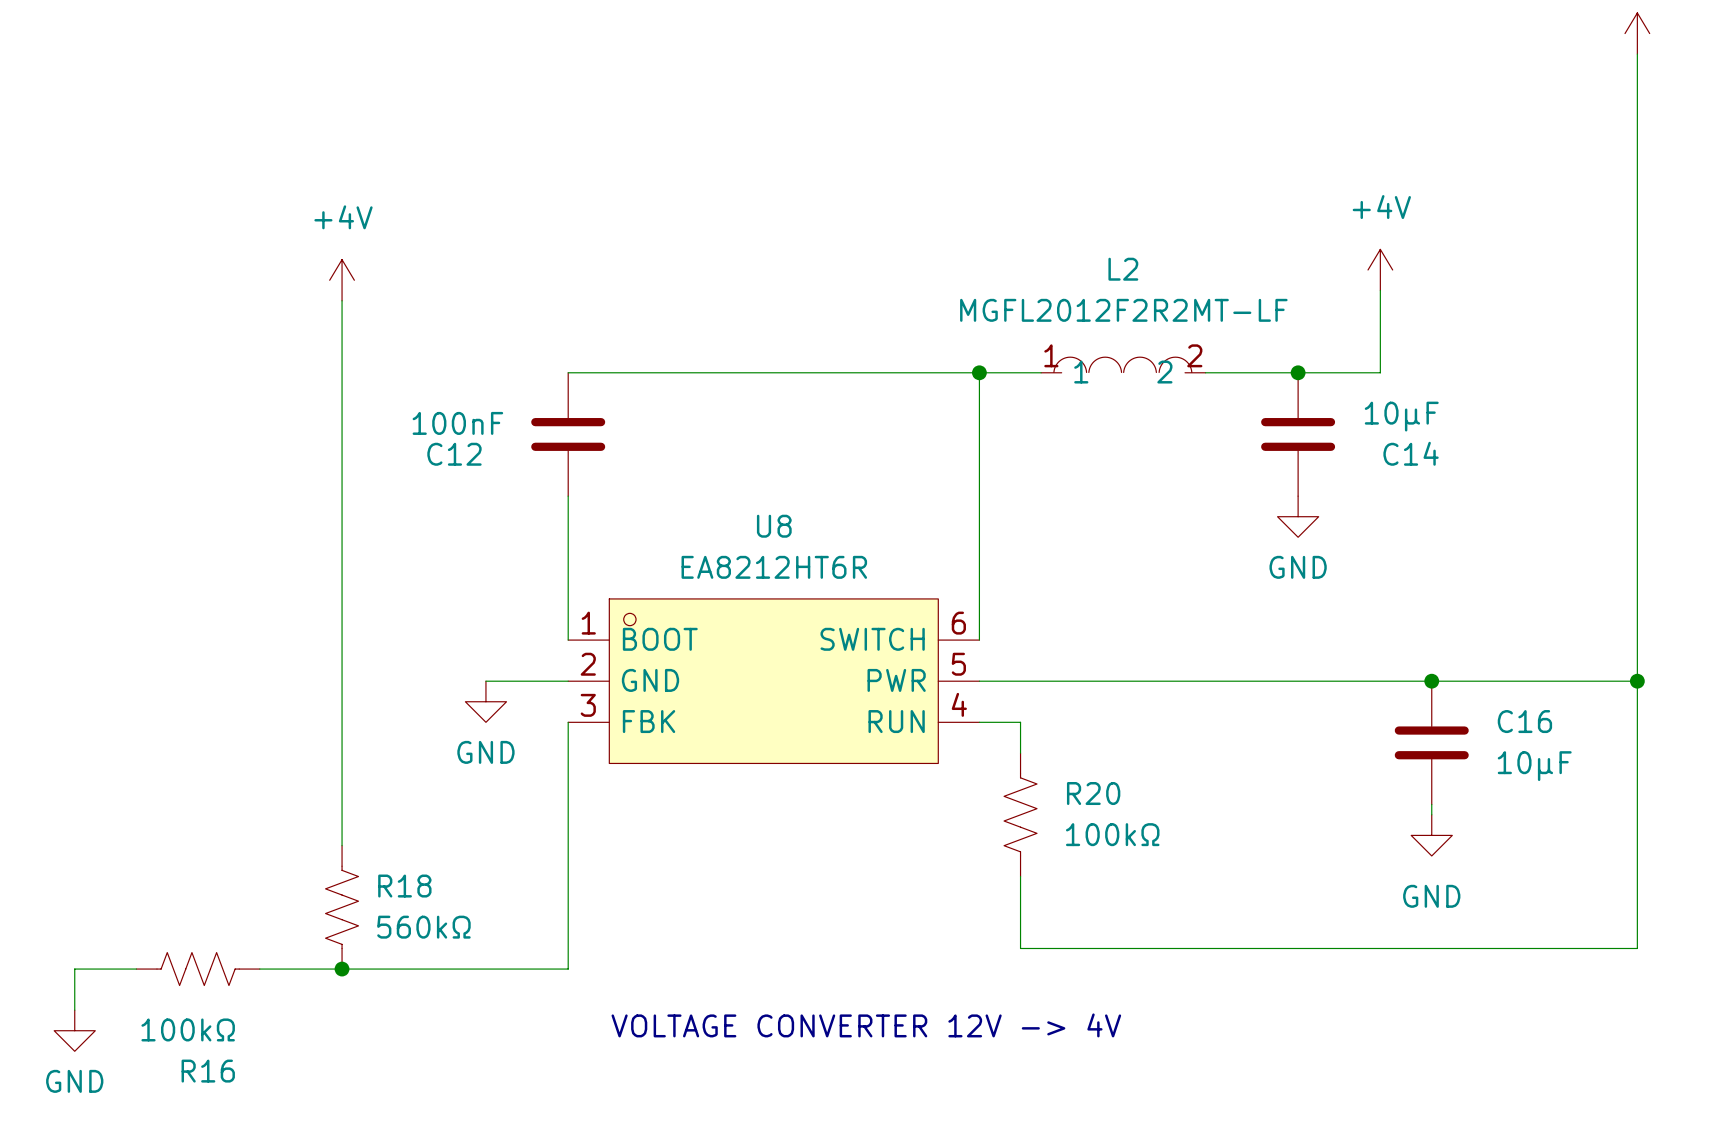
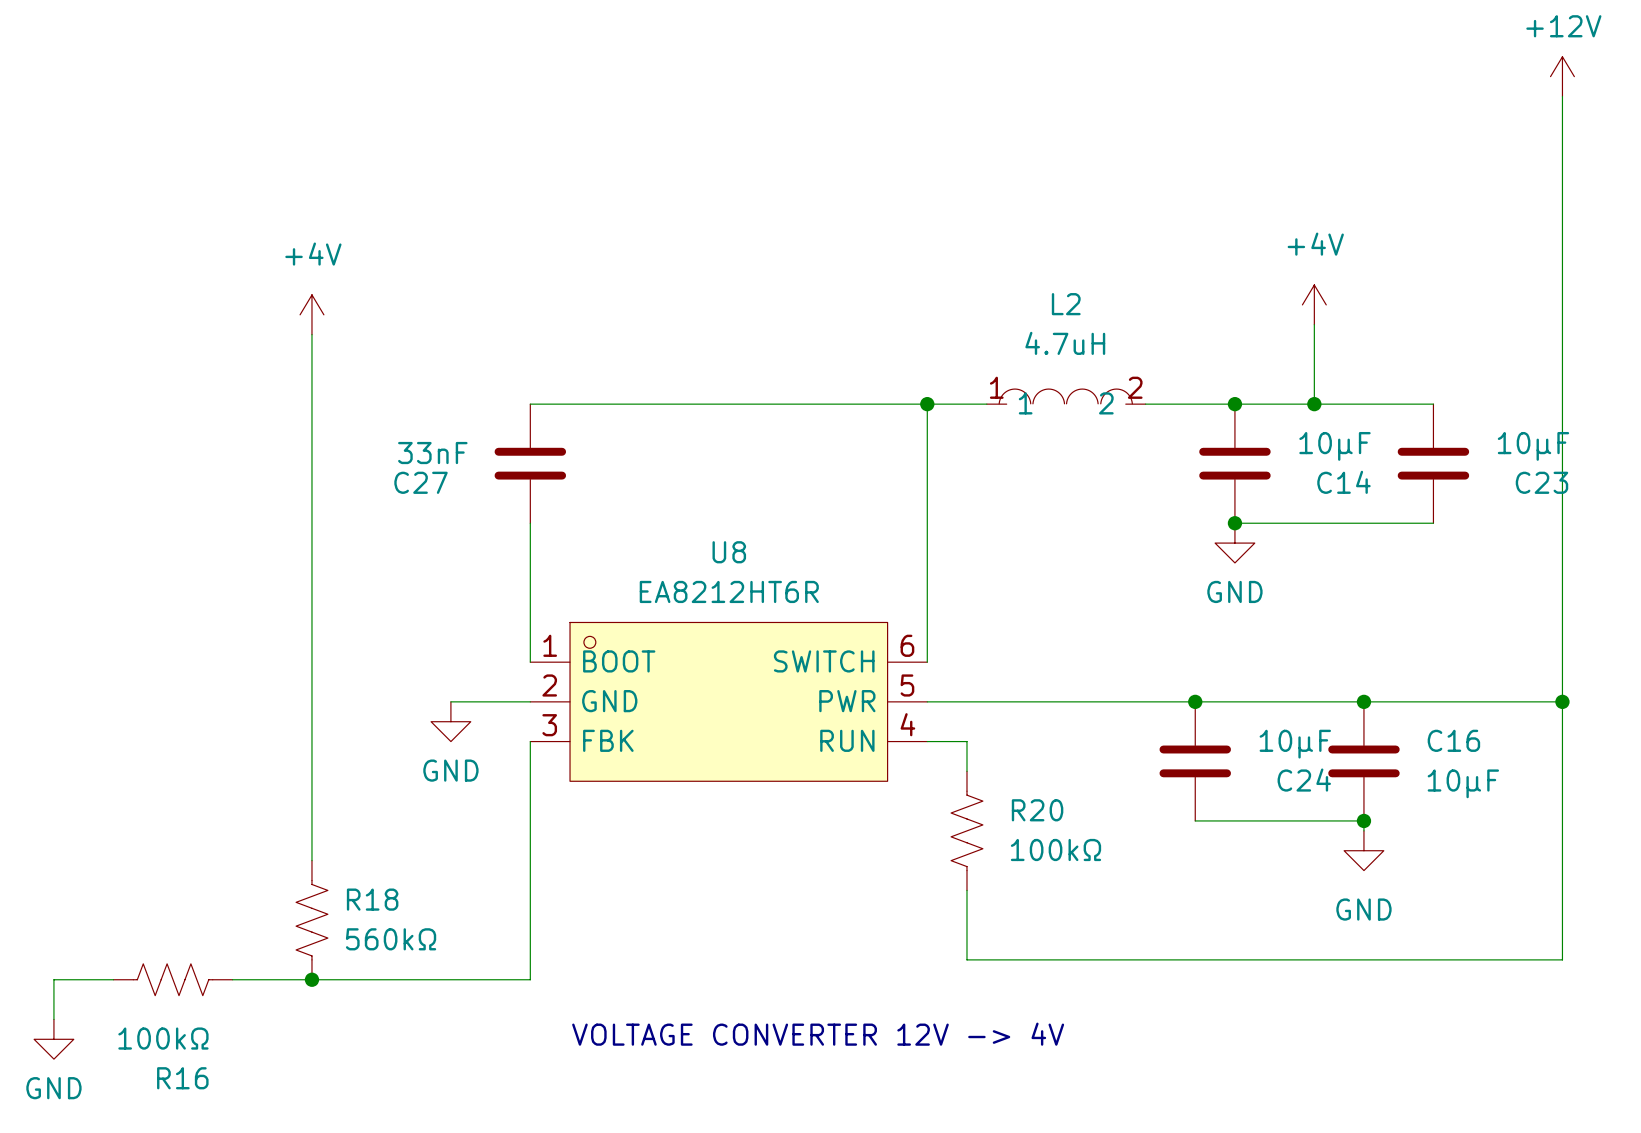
L2 value: MGFL2012F2R2MT-LF (1123, 310) -> 4.7uH (1065, 343)
wire: none -> (1314, 404) (1433, 404)
junction: none -> (1314, 404)
C12 value: 100nF (457, 423) -> 33nF (432, 453)
C23: none -> 10µF (1433, 463)
C12 name: C12 (454, 454) -> C27 (421, 482)
wire: none -> (1234, 523) (1433, 523)
junction: none -> (1234, 523)
junction: none -> (1195, 701)
C24: none -> 10µF (1195, 761)
wire: none -> (1195, 820) (1363, 820)
junction: none -> (1363, 820)

